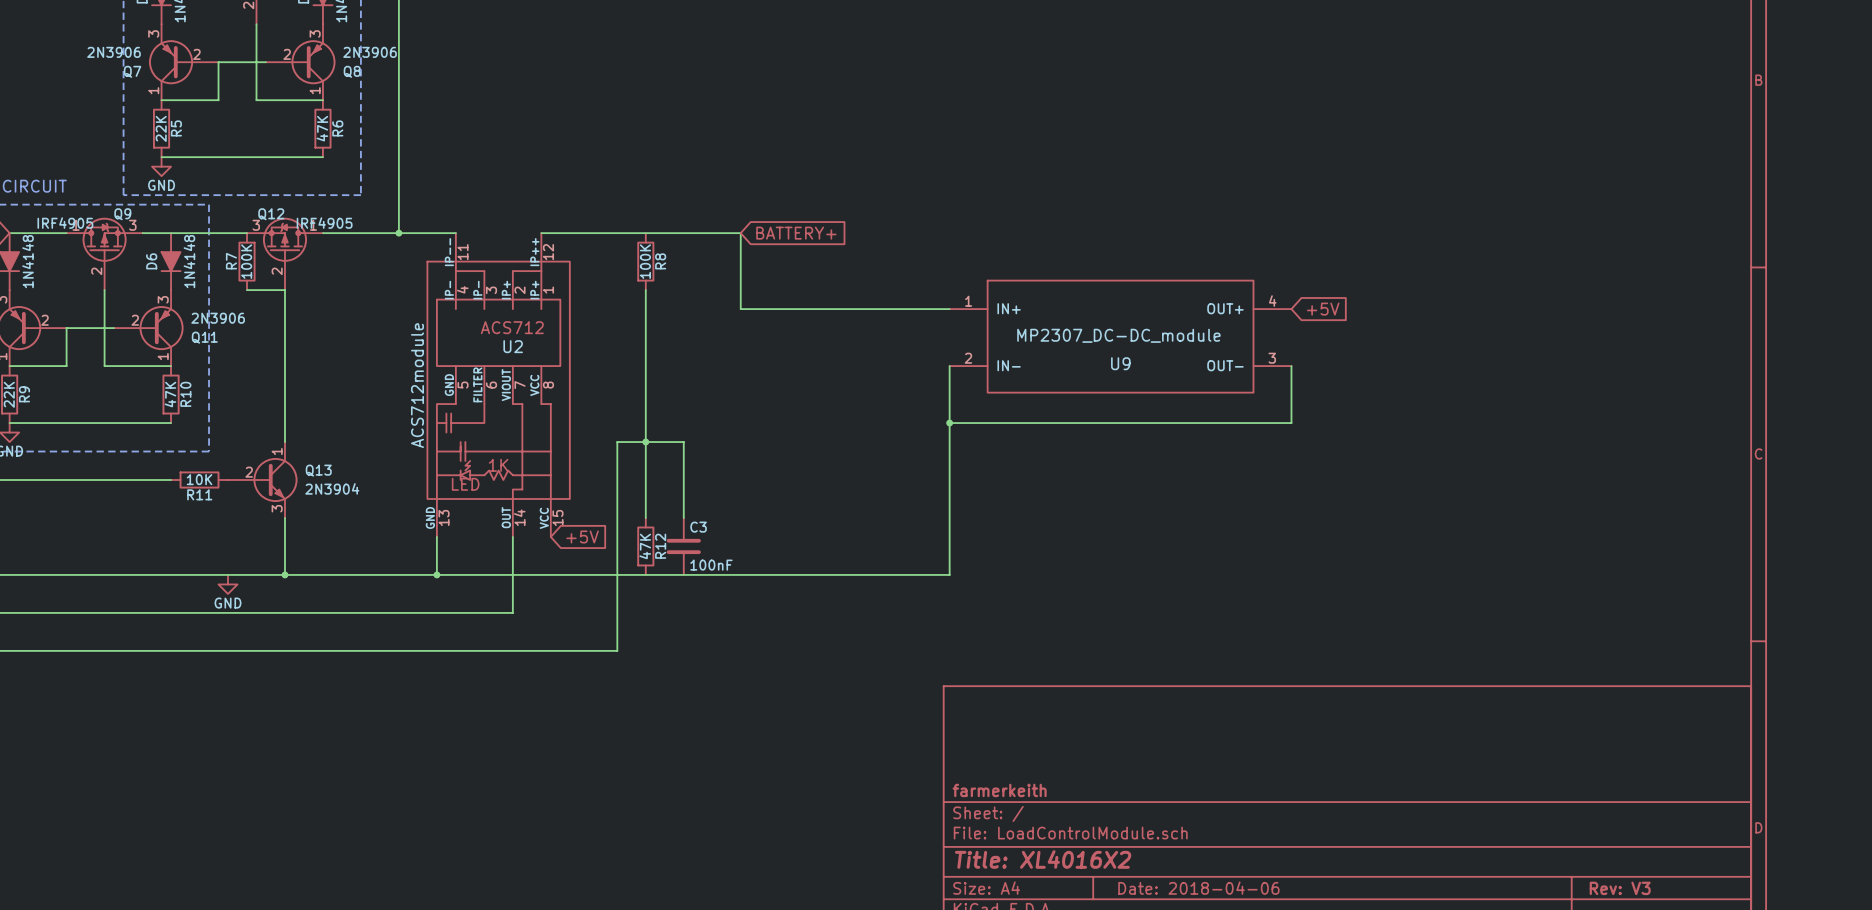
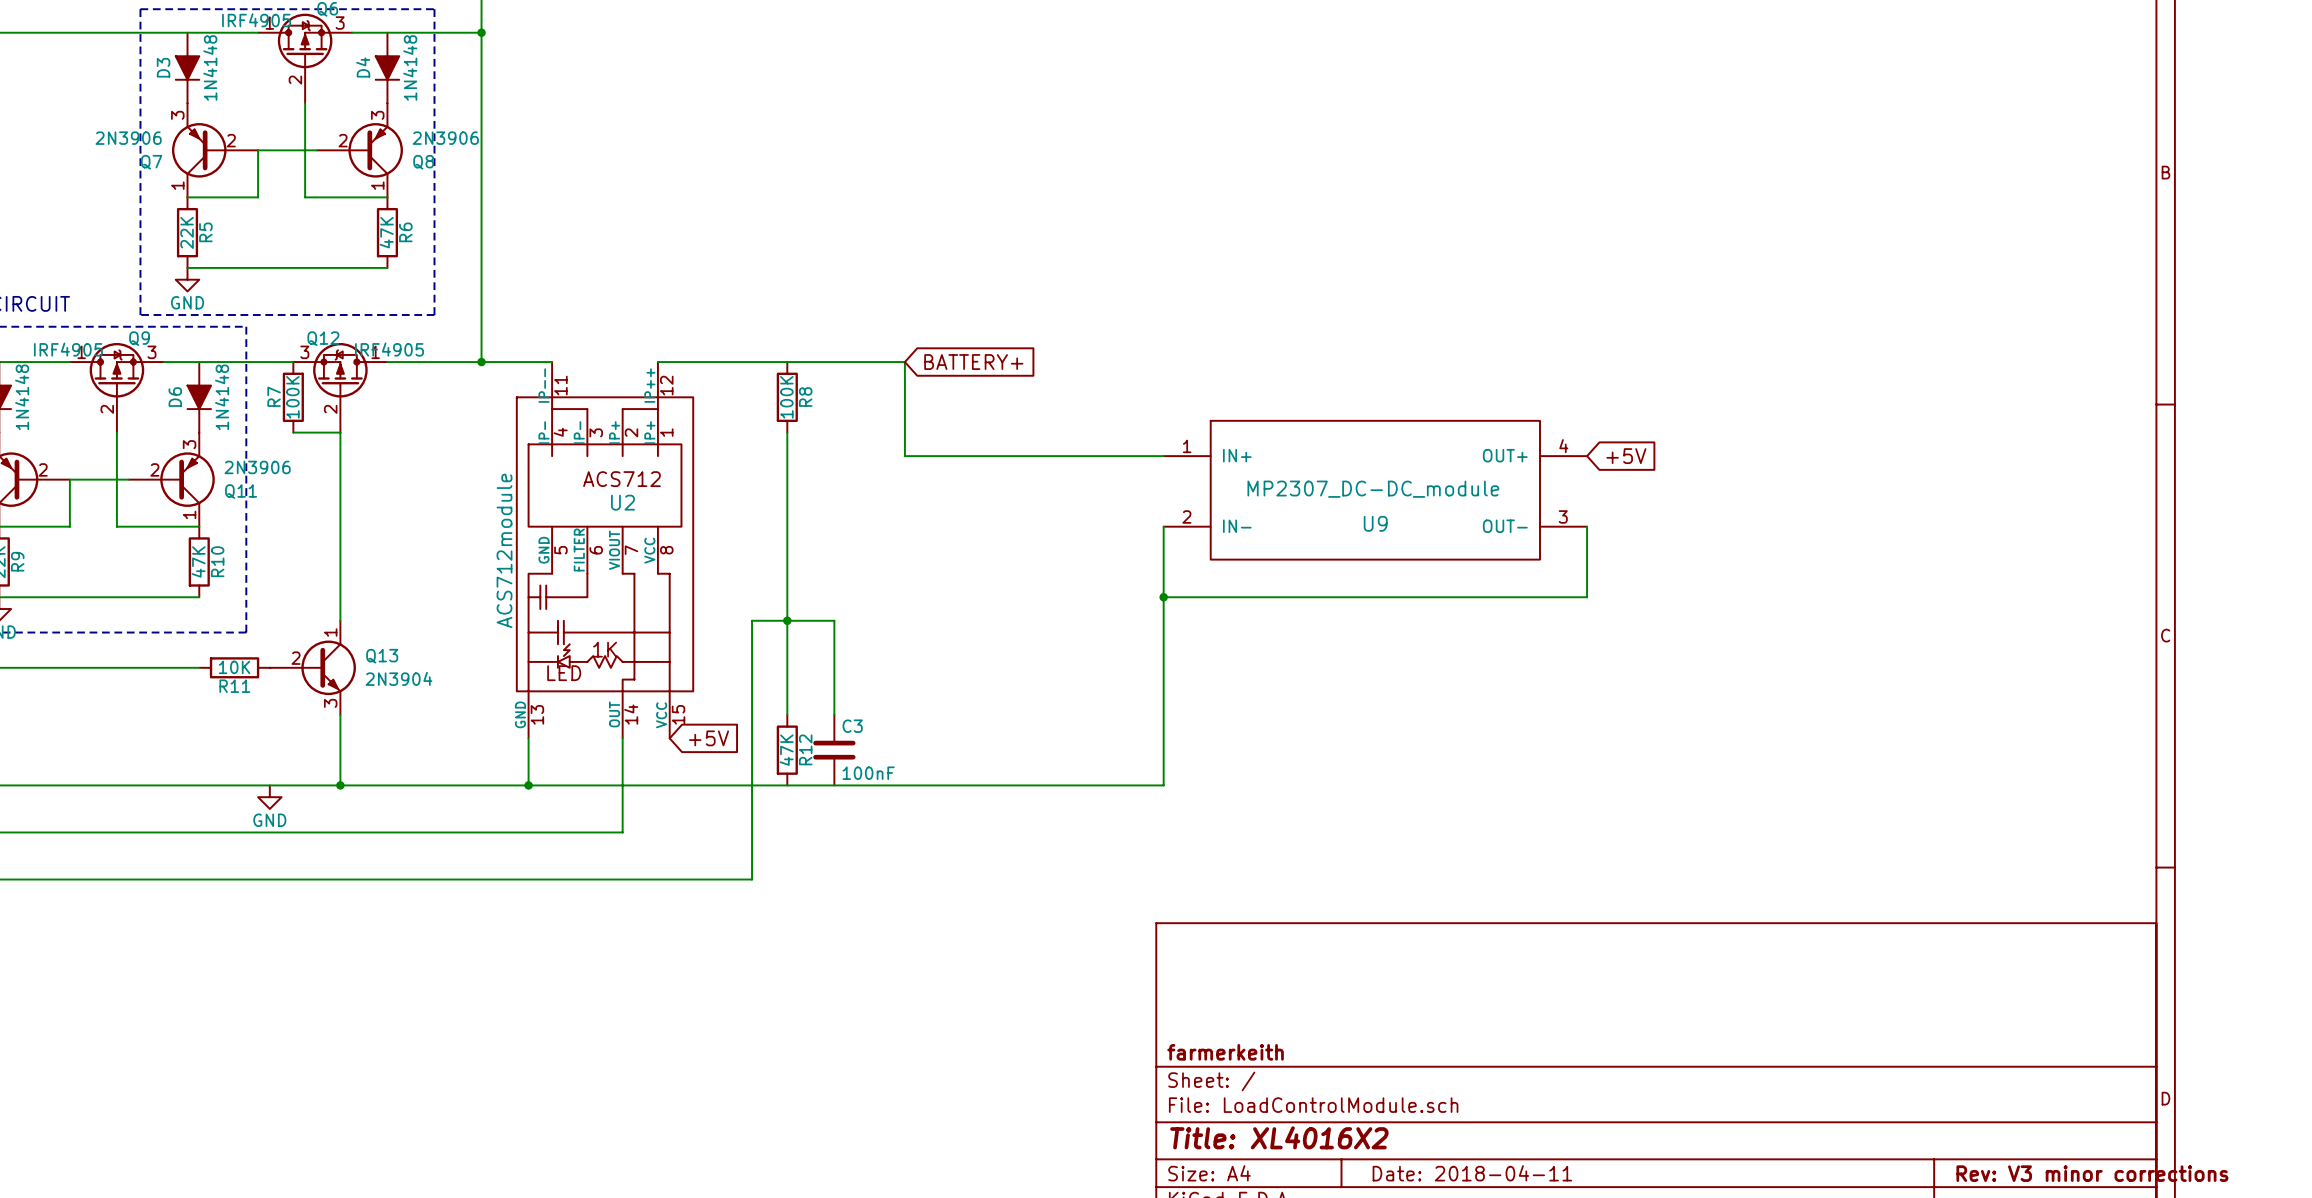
title block: Date: 2018-04-06 (1198, 888) -> Date: 2018-04-11 (1472, 1173)
title block: Rev: V3 (1620, 888) -> Rev: V3 minor corrections (2092, 1173)

